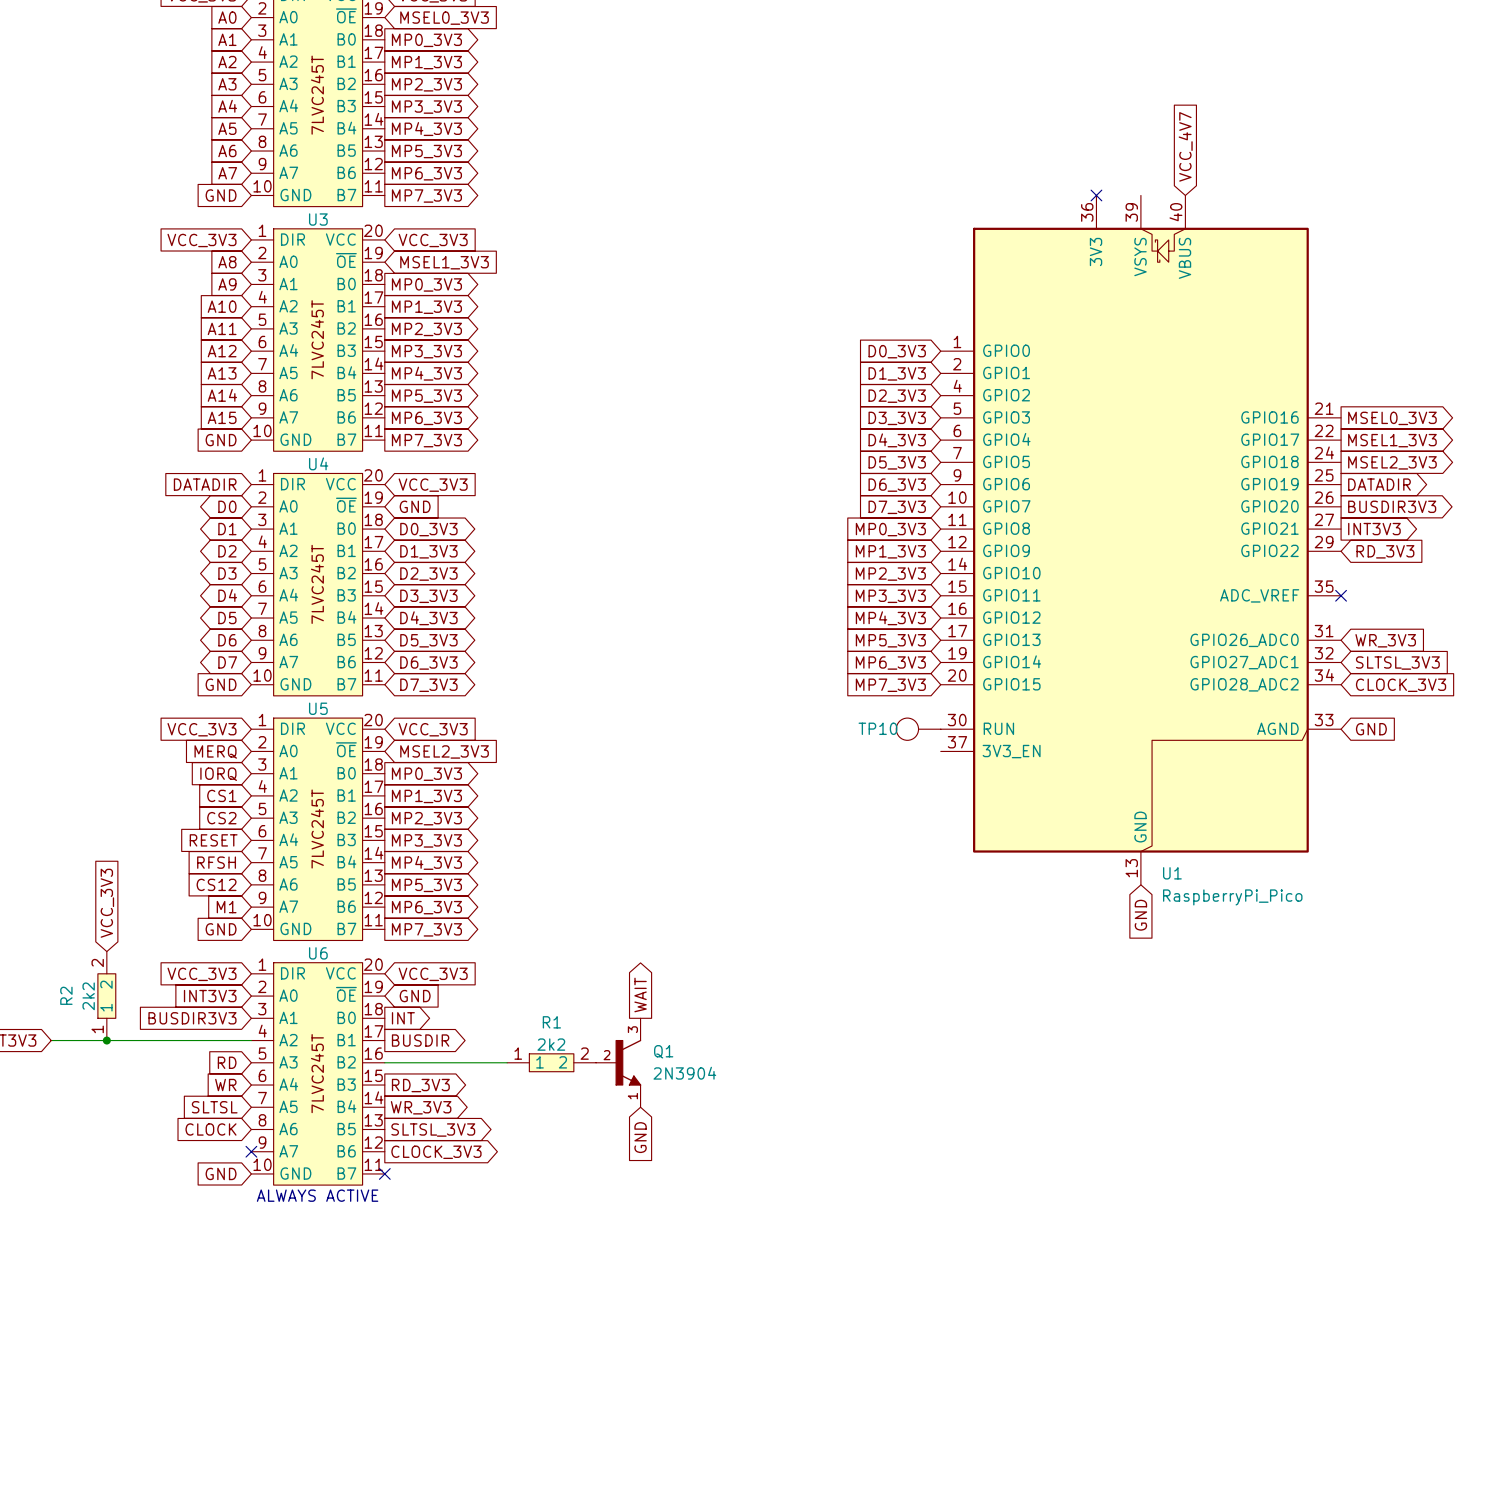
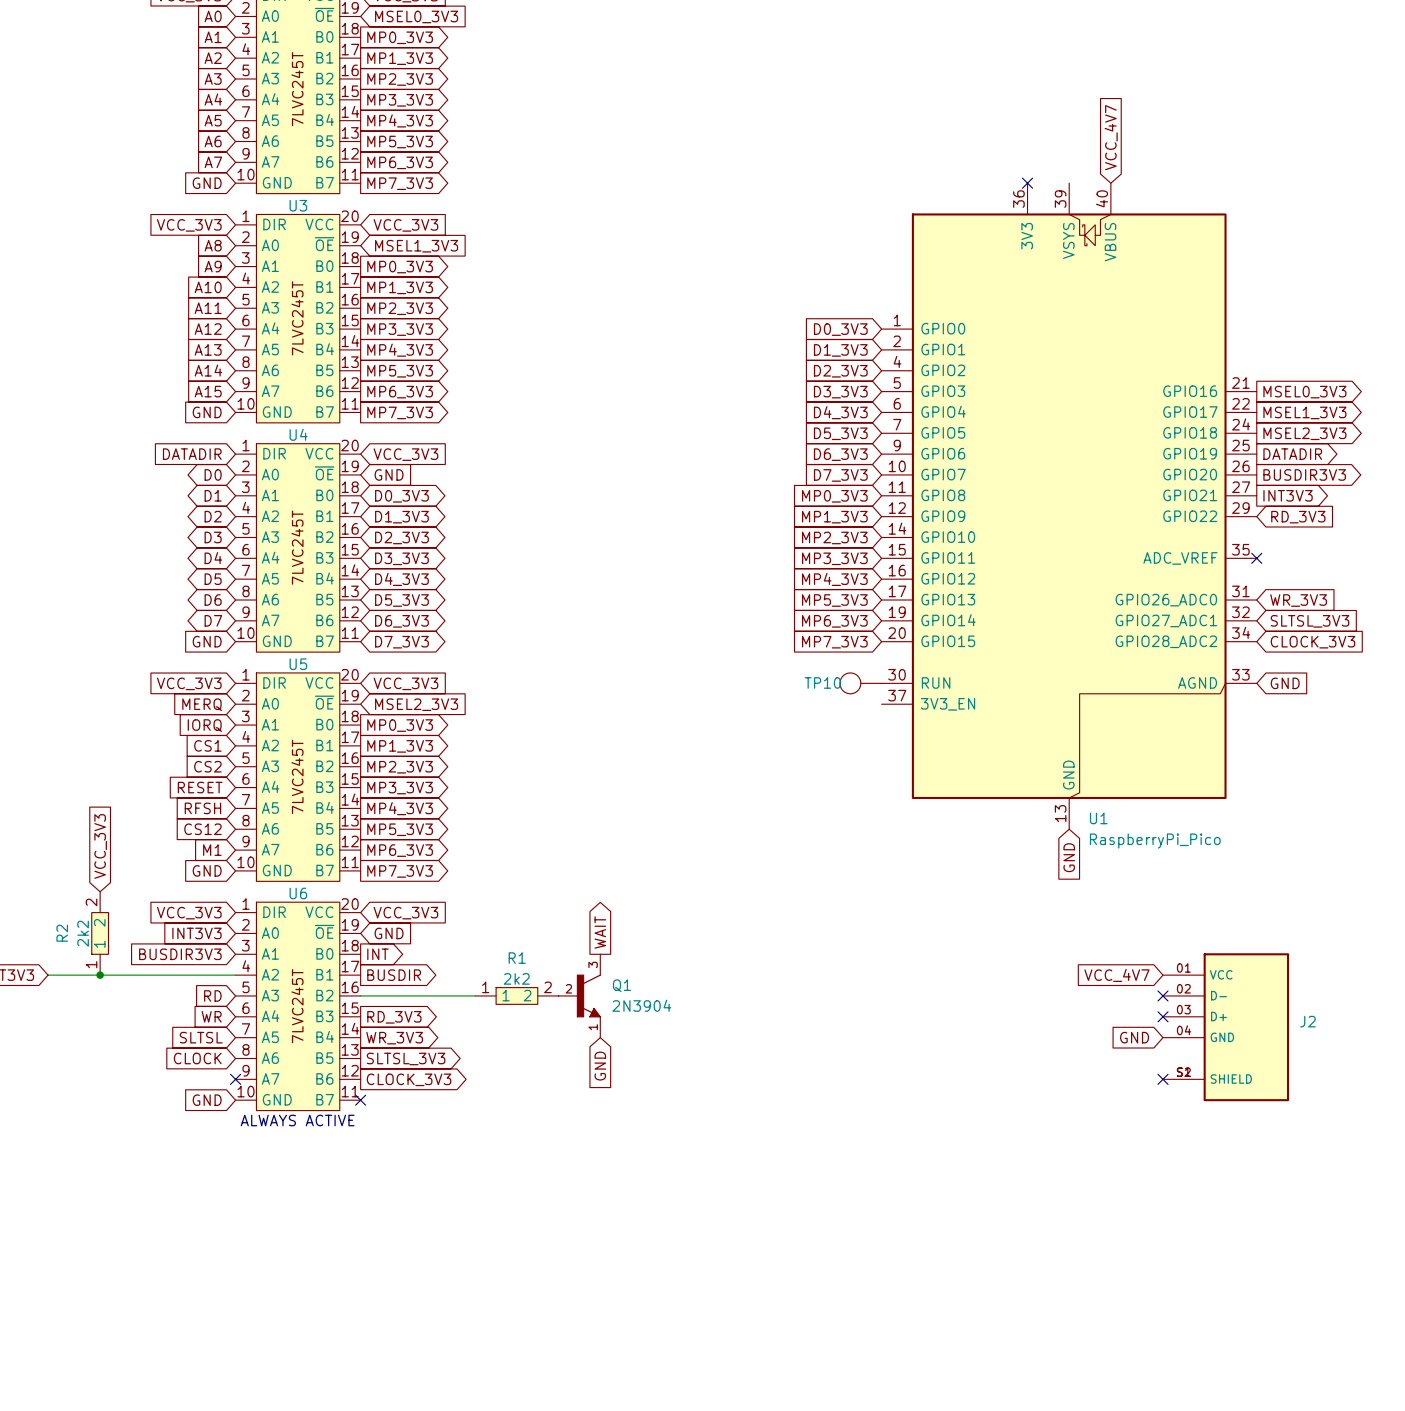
global label: none -> VCC_4V7 (1116, 975)
no-connect mark: none -> (1162, 995)
no-connect mark: none -> (1162, 1016)
J2: none -> (1226, 1027)
global label: none -> GND (1134, 1037)
no-connect mark: none -> (1162, 1079)

